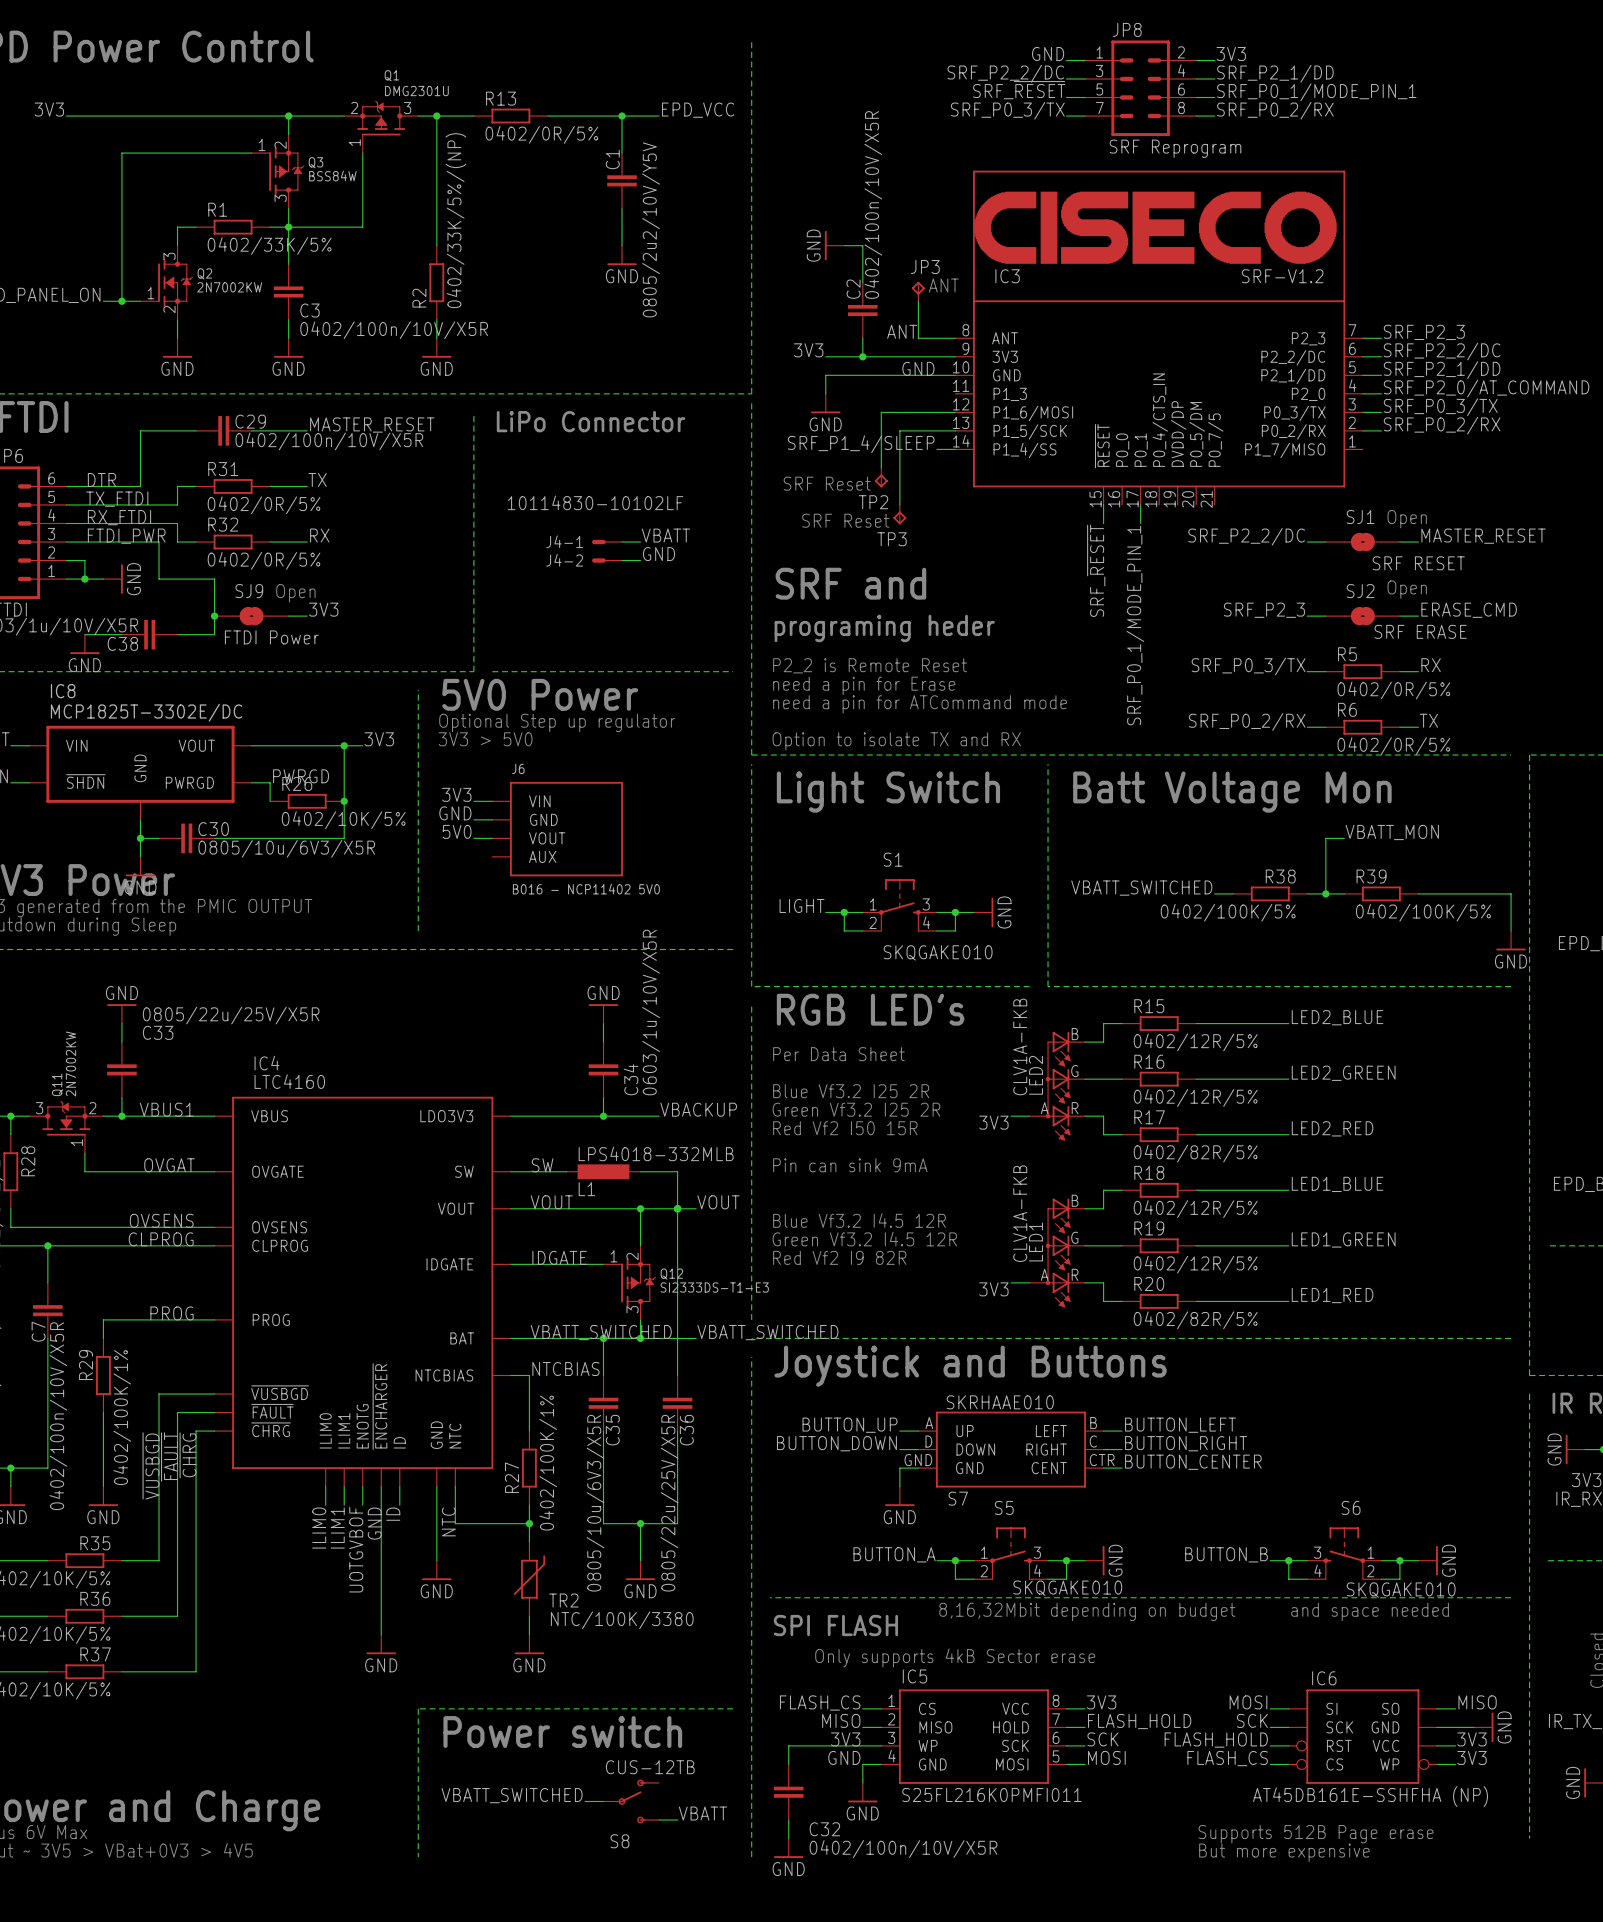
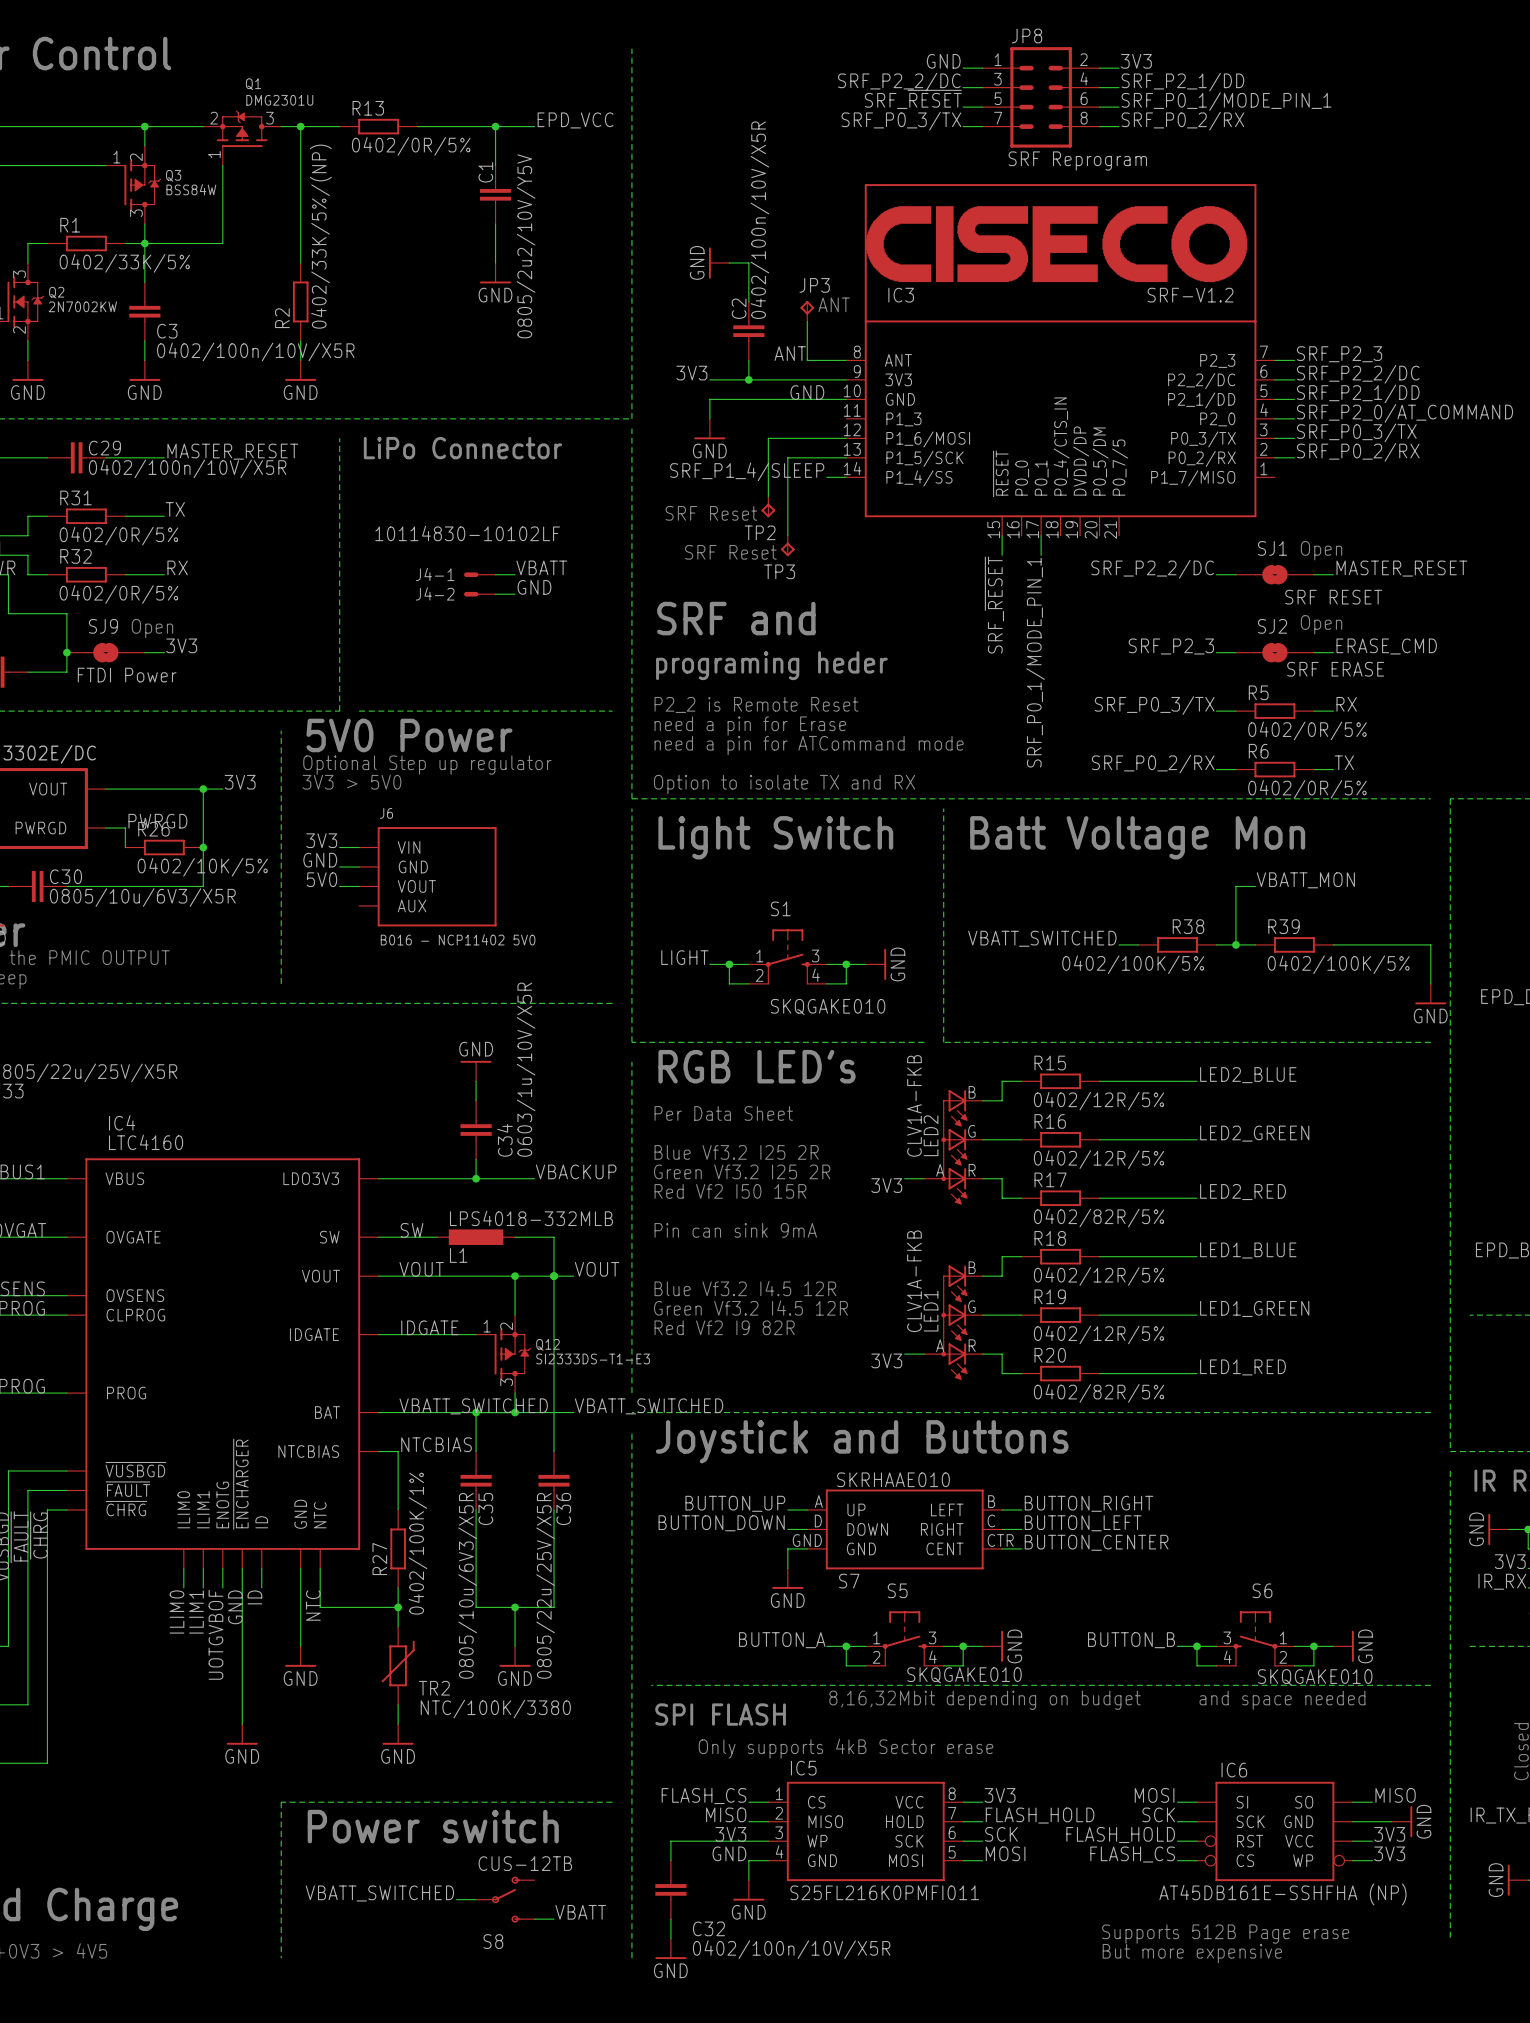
label: BUTTON_LEFT (1180, 1425) -> BUTTON_RIGHT (1088, 1503)
label: BUTTON_RIGHT (1186, 1443) -> BUTTON_LEFT (1083, 1523)

